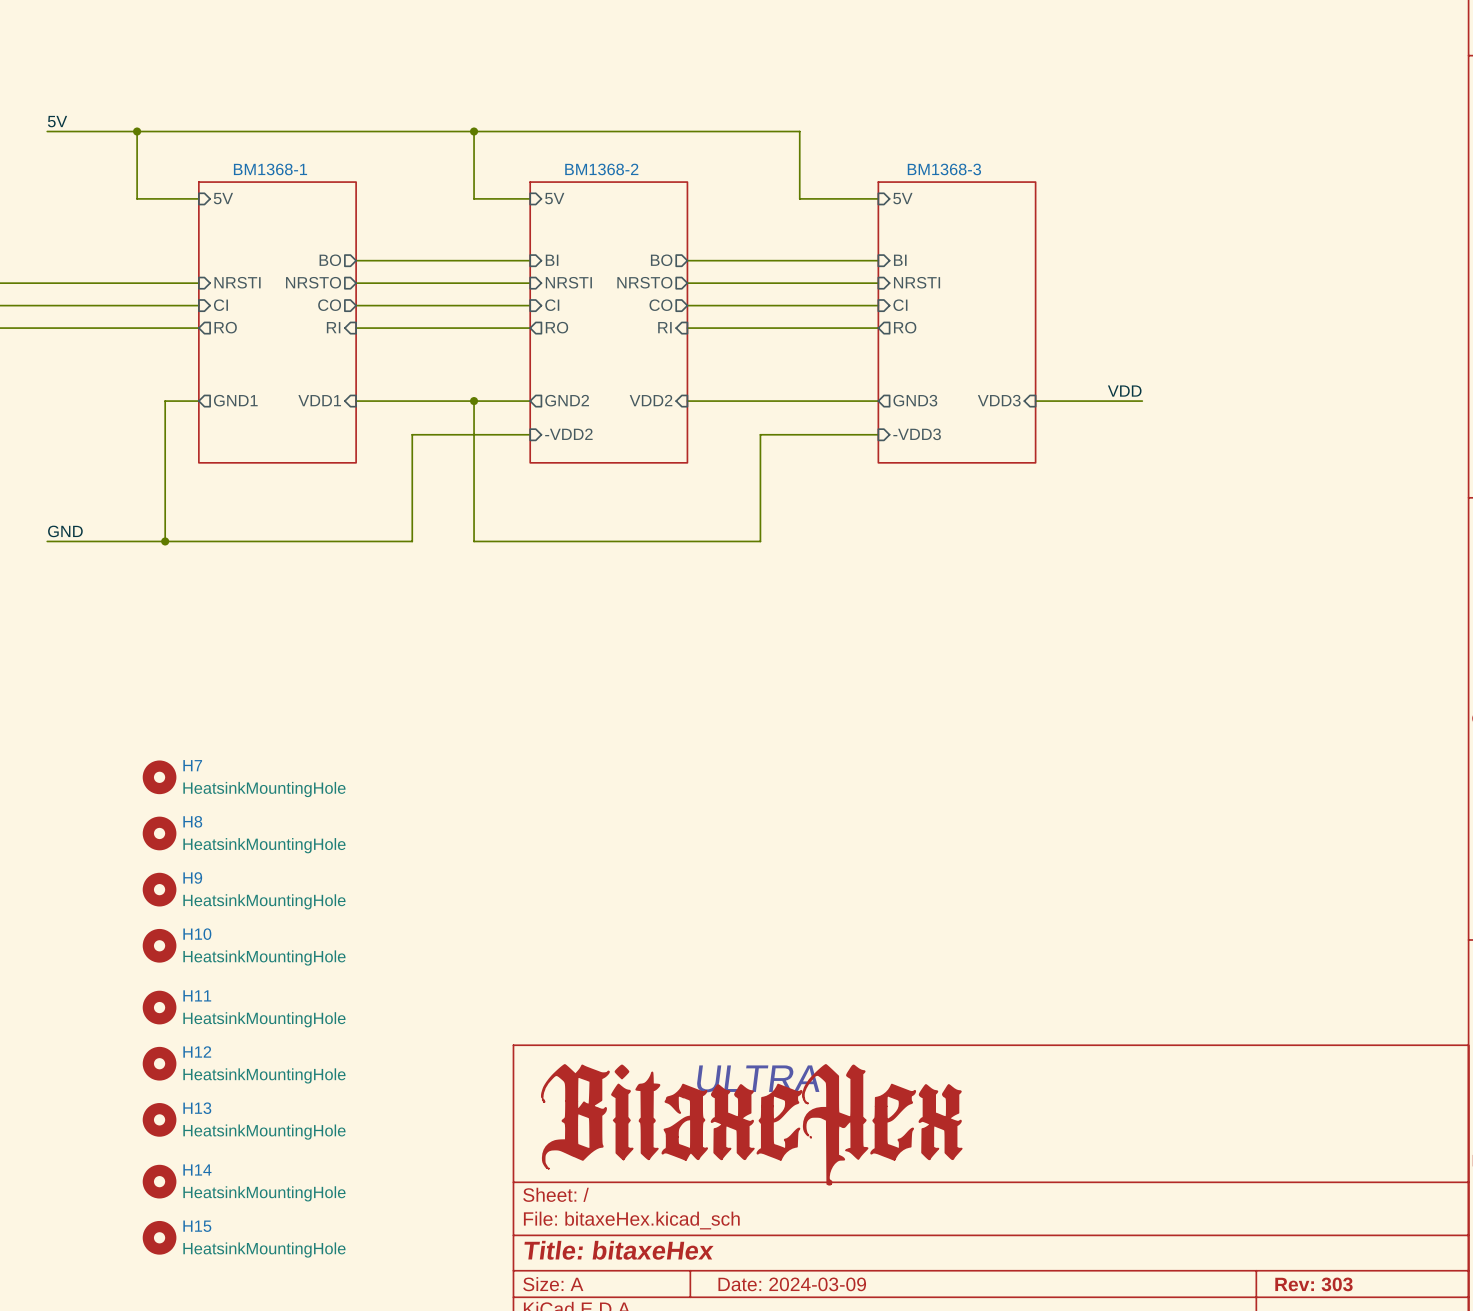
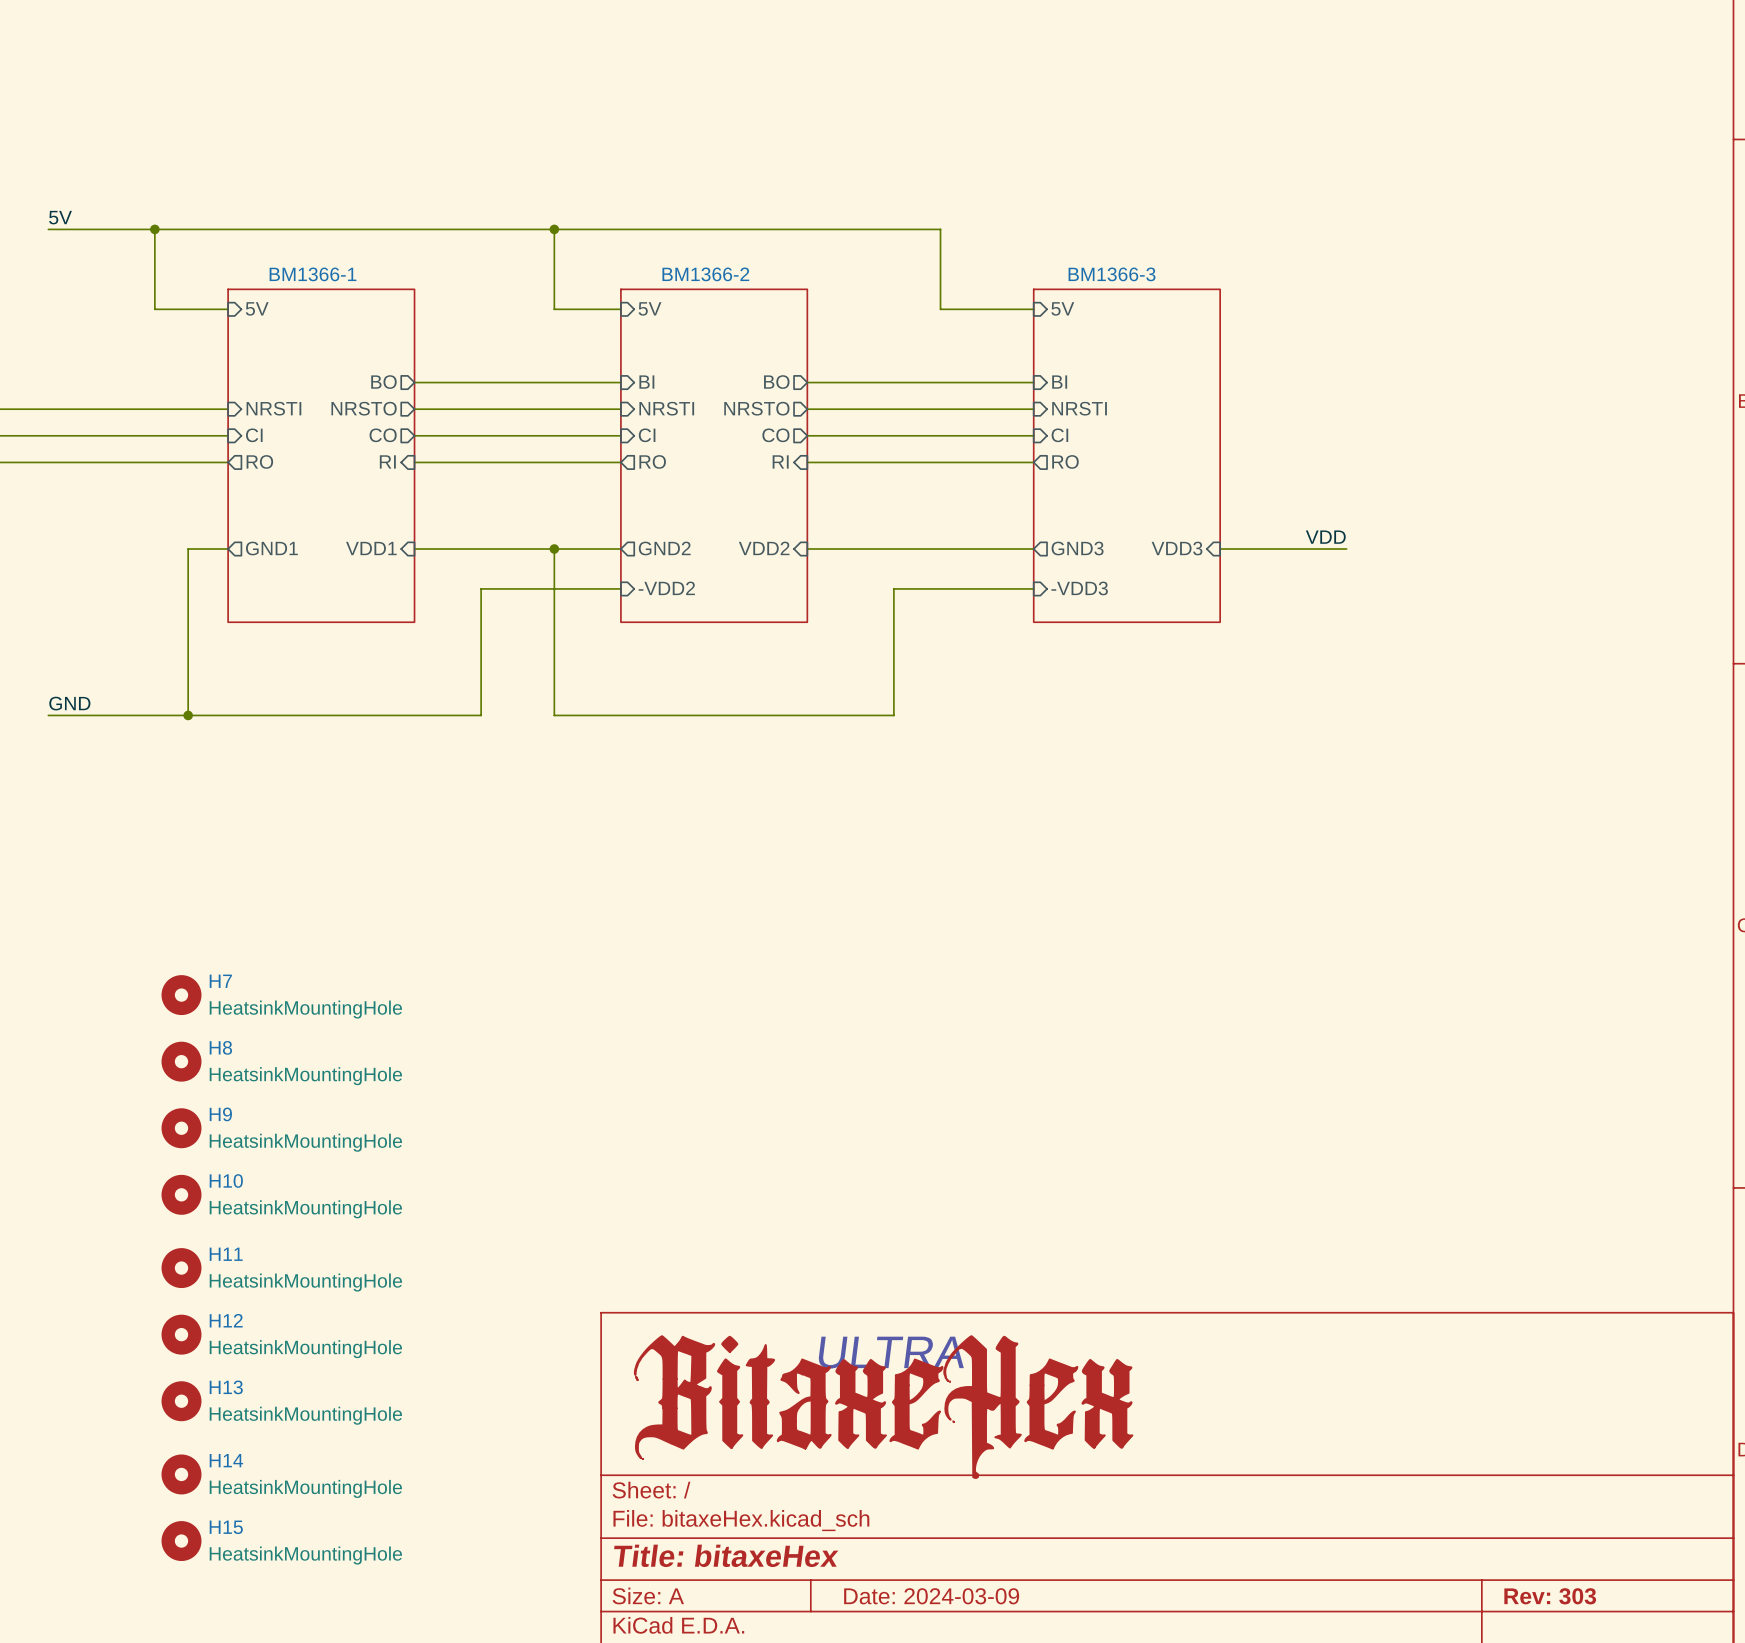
sheet BM1368-1 name: BM1368-1 (270, 169) -> BM1366-1 (313, 274)
sheet BM1368-2 name: BM1368-2 (601, 169) -> BM1366-2 (705, 274)
sheet BM1368-3 name: BM1368-3 (944, 169) -> BM1366-3 (1112, 274)

